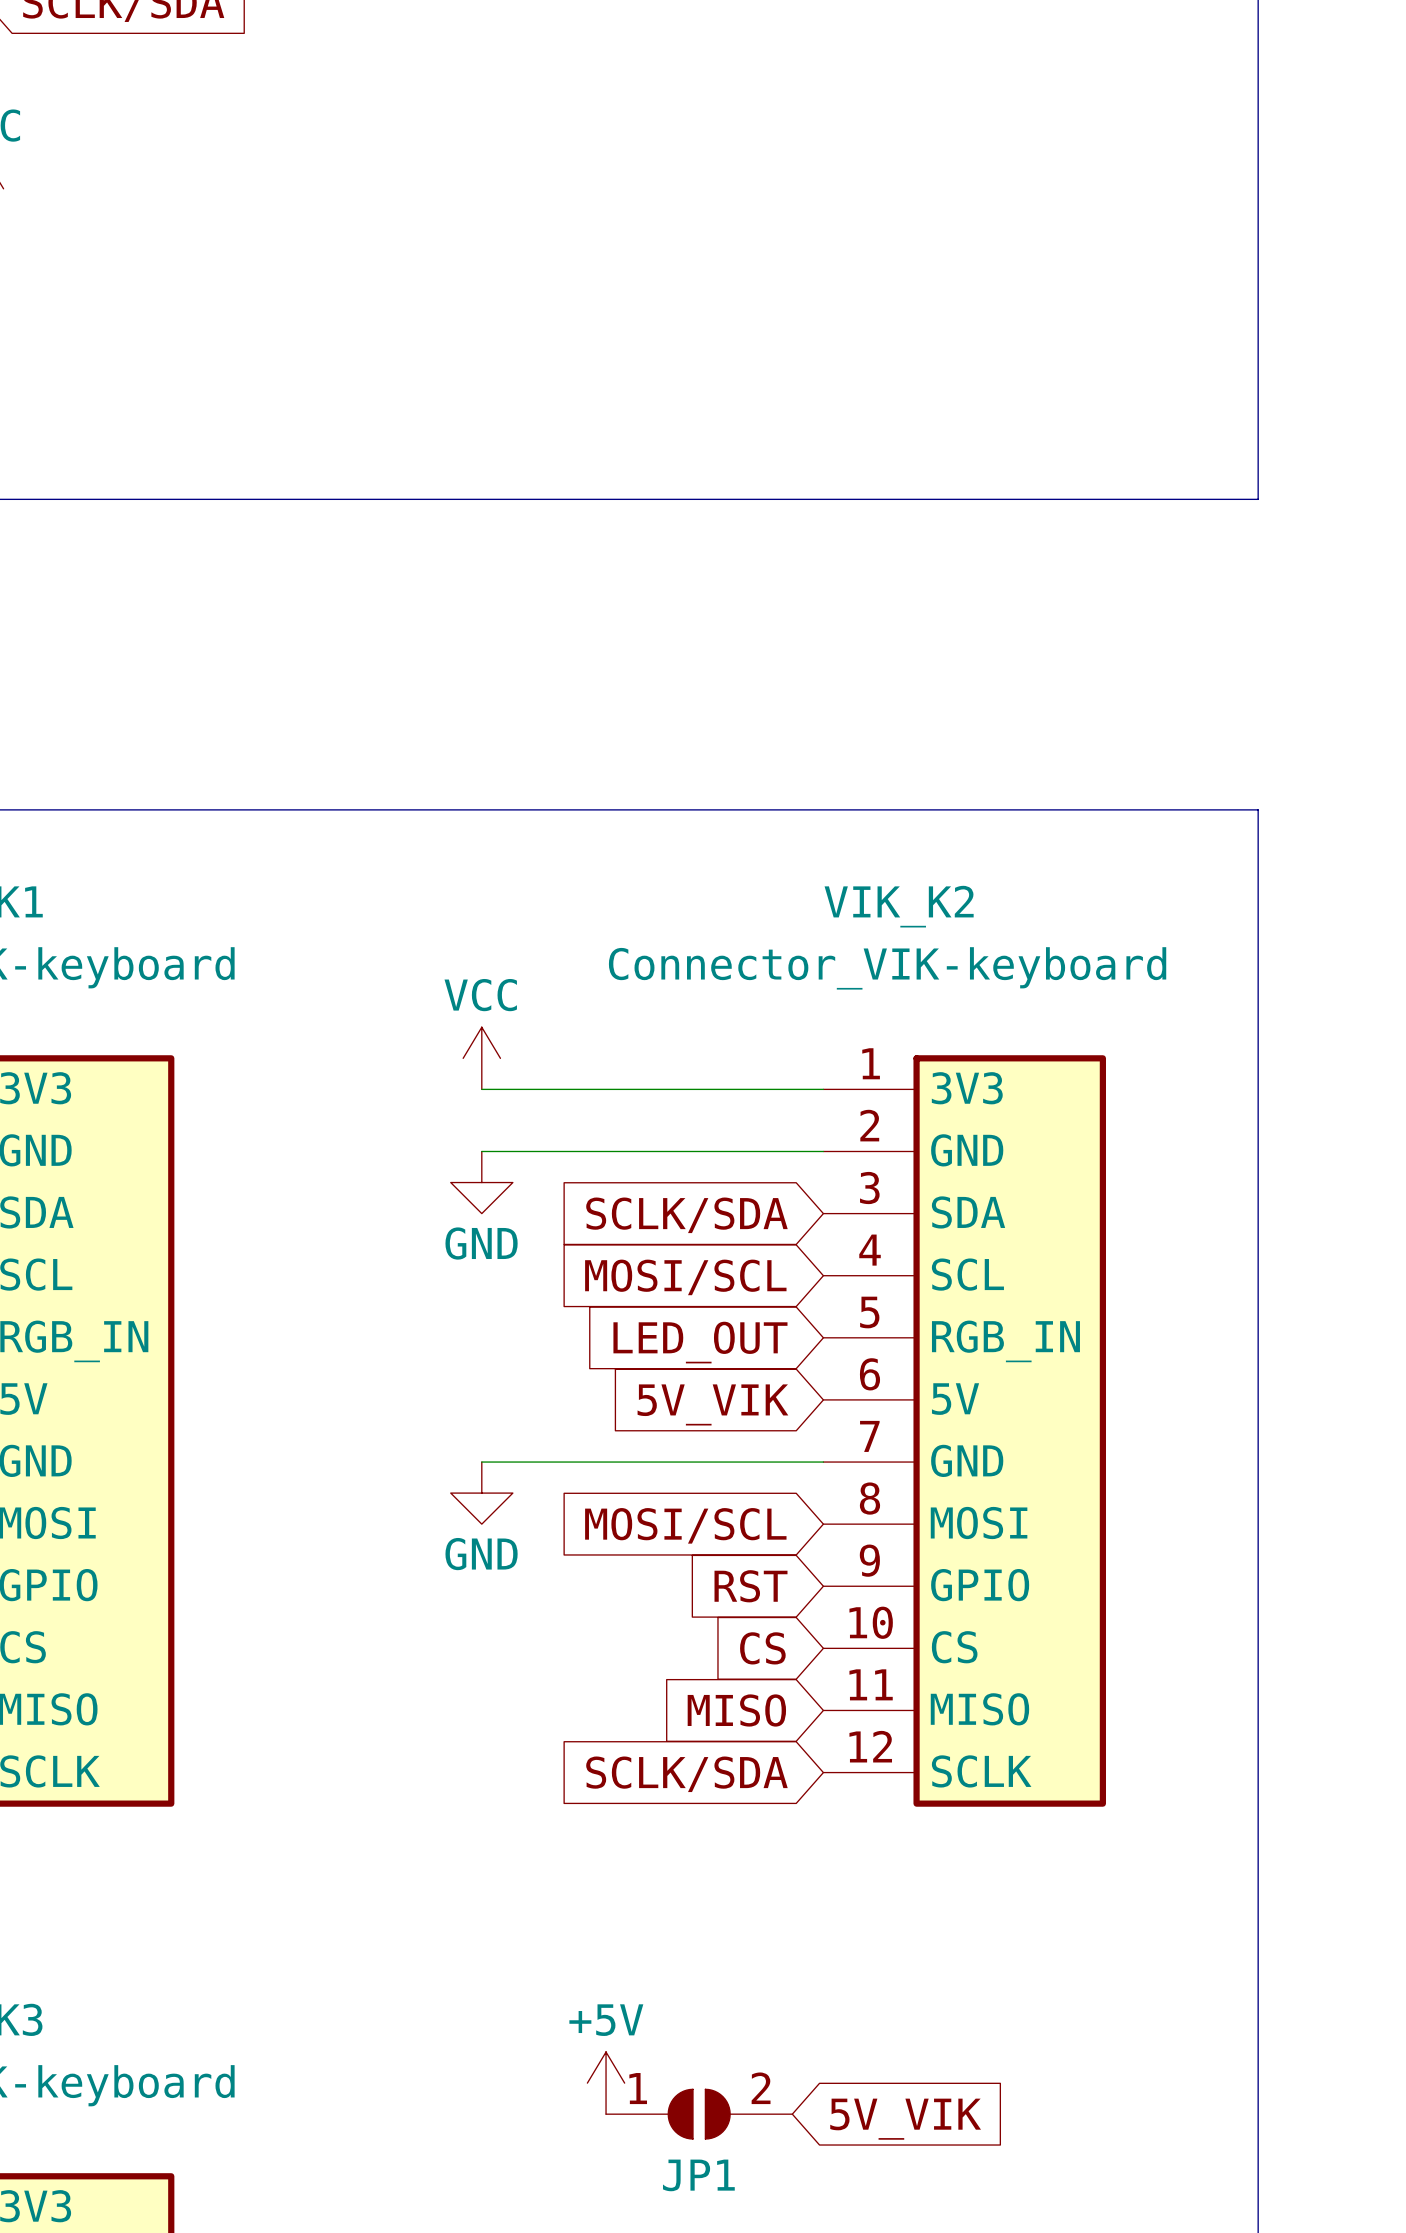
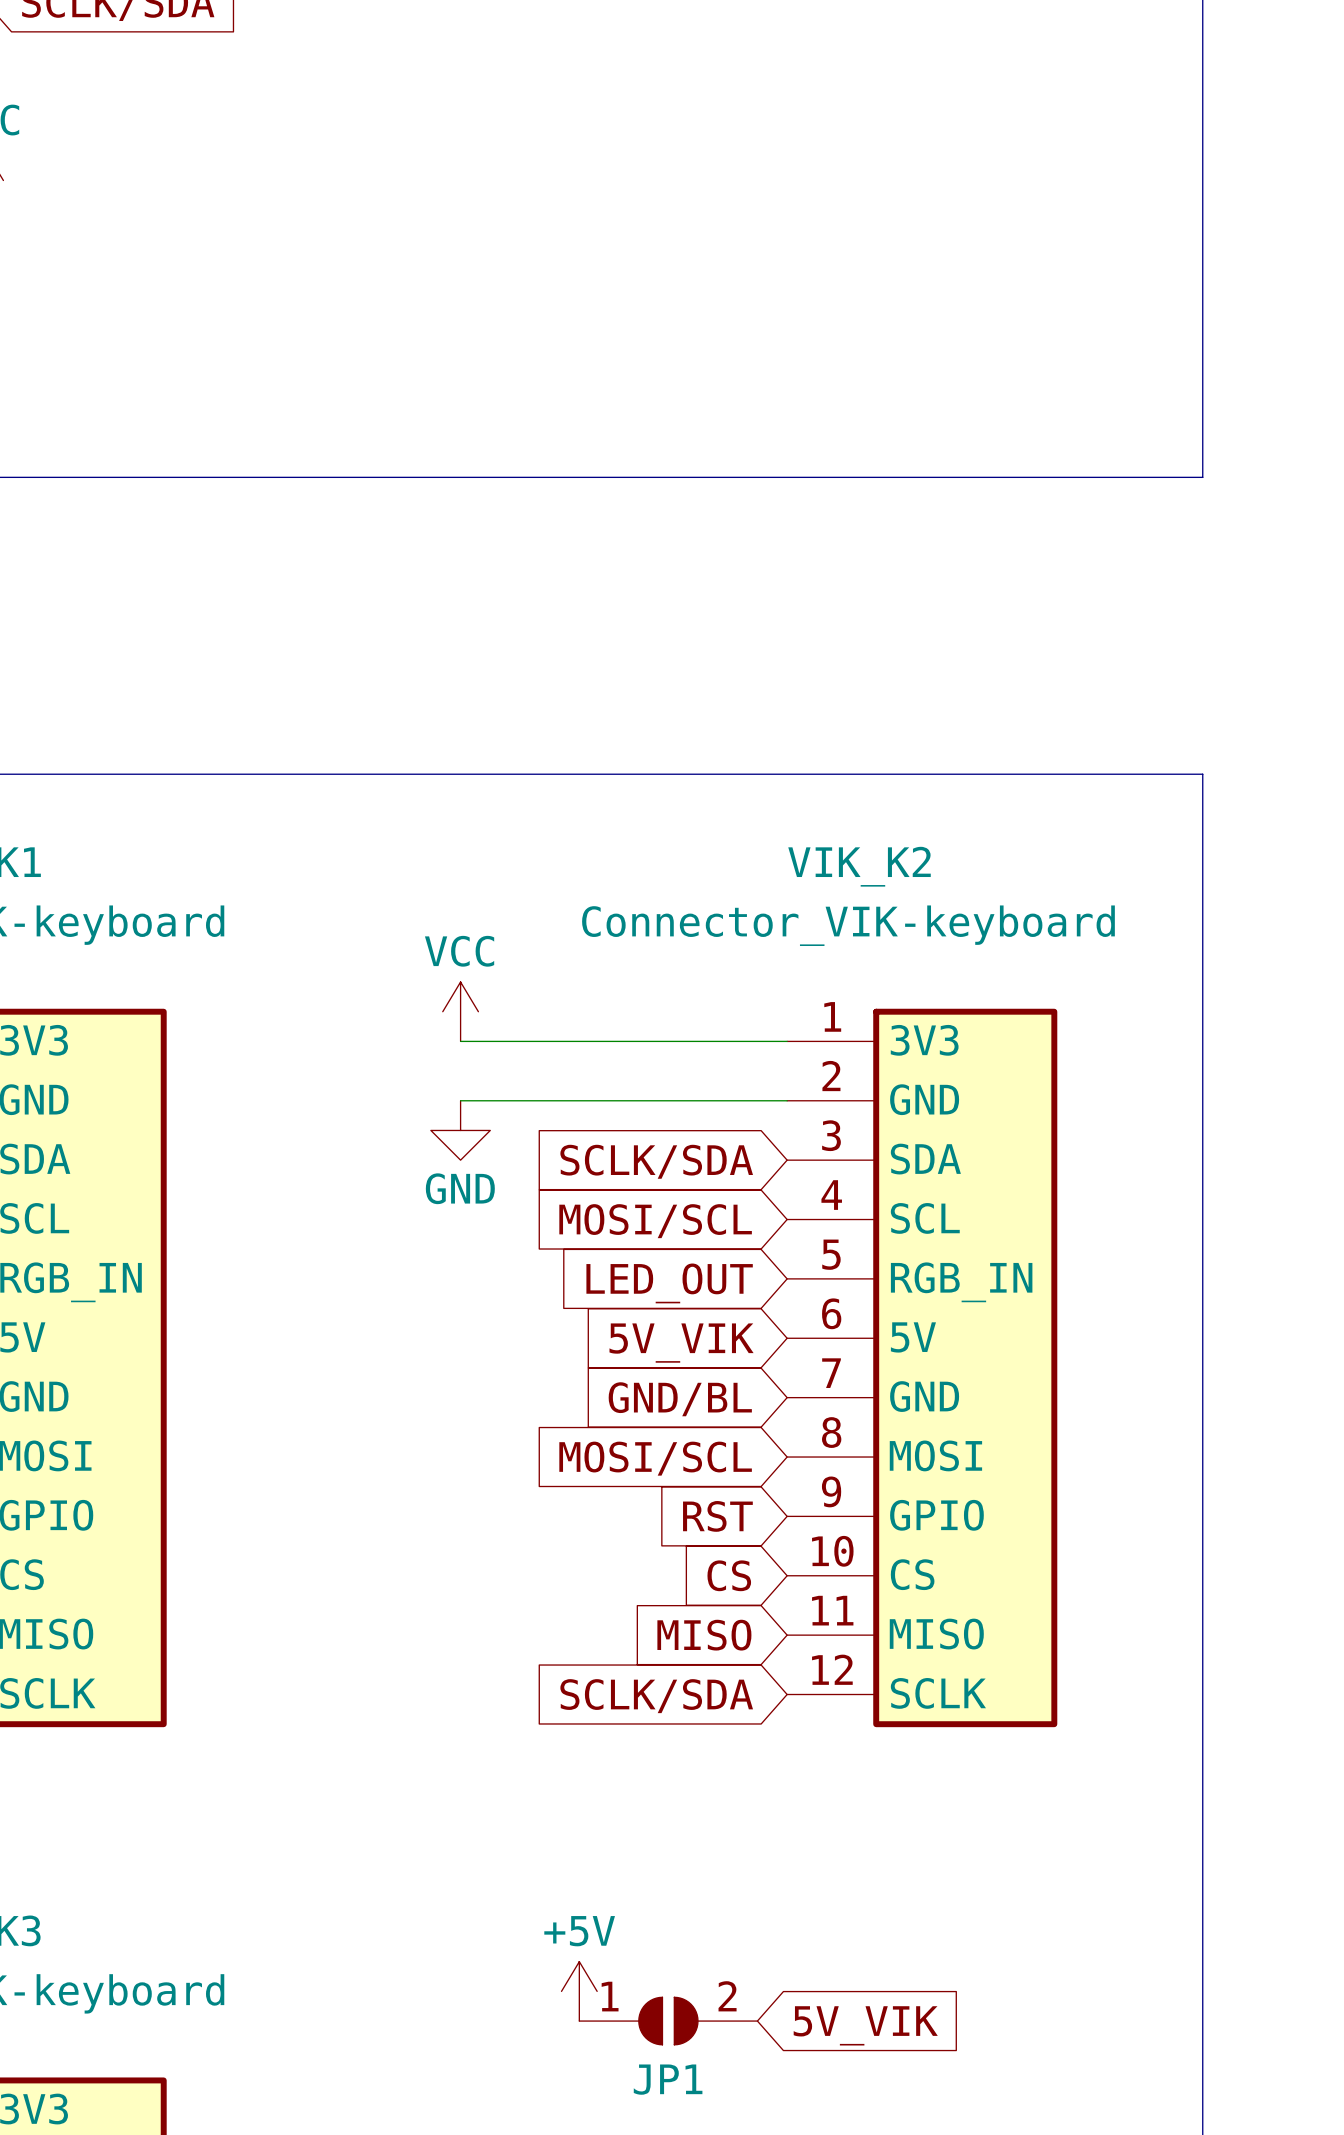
wire: (481, 1462) (823, 1462) -> none
global label: none -> GND/BL (680, 1399)
power symbol: GND (481, 1493) -> none

